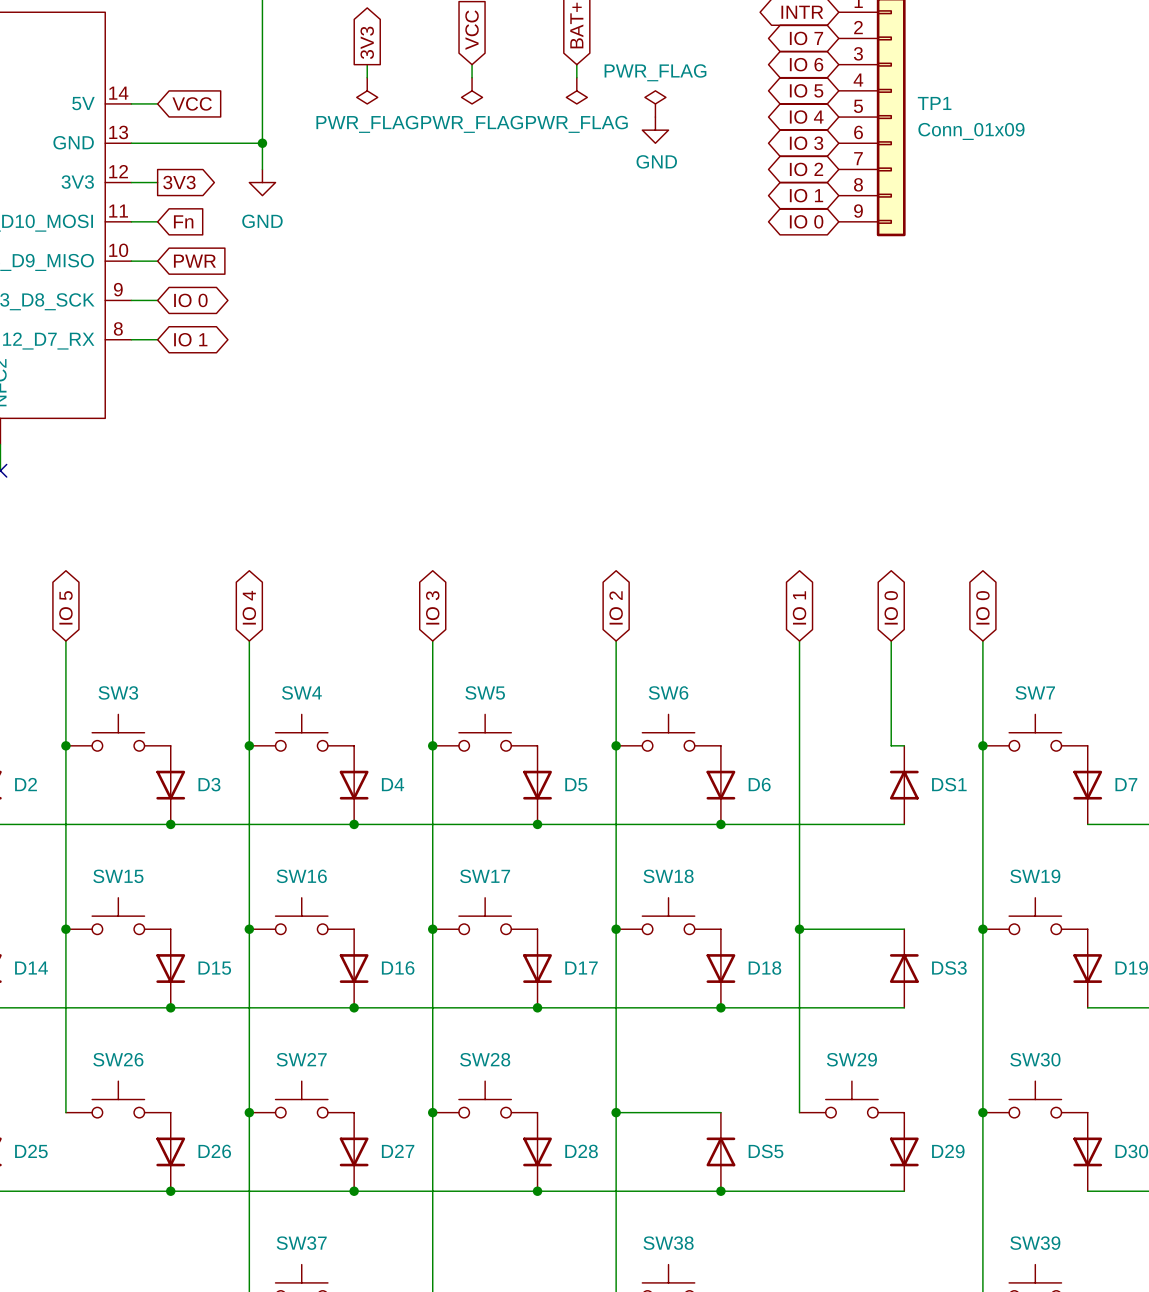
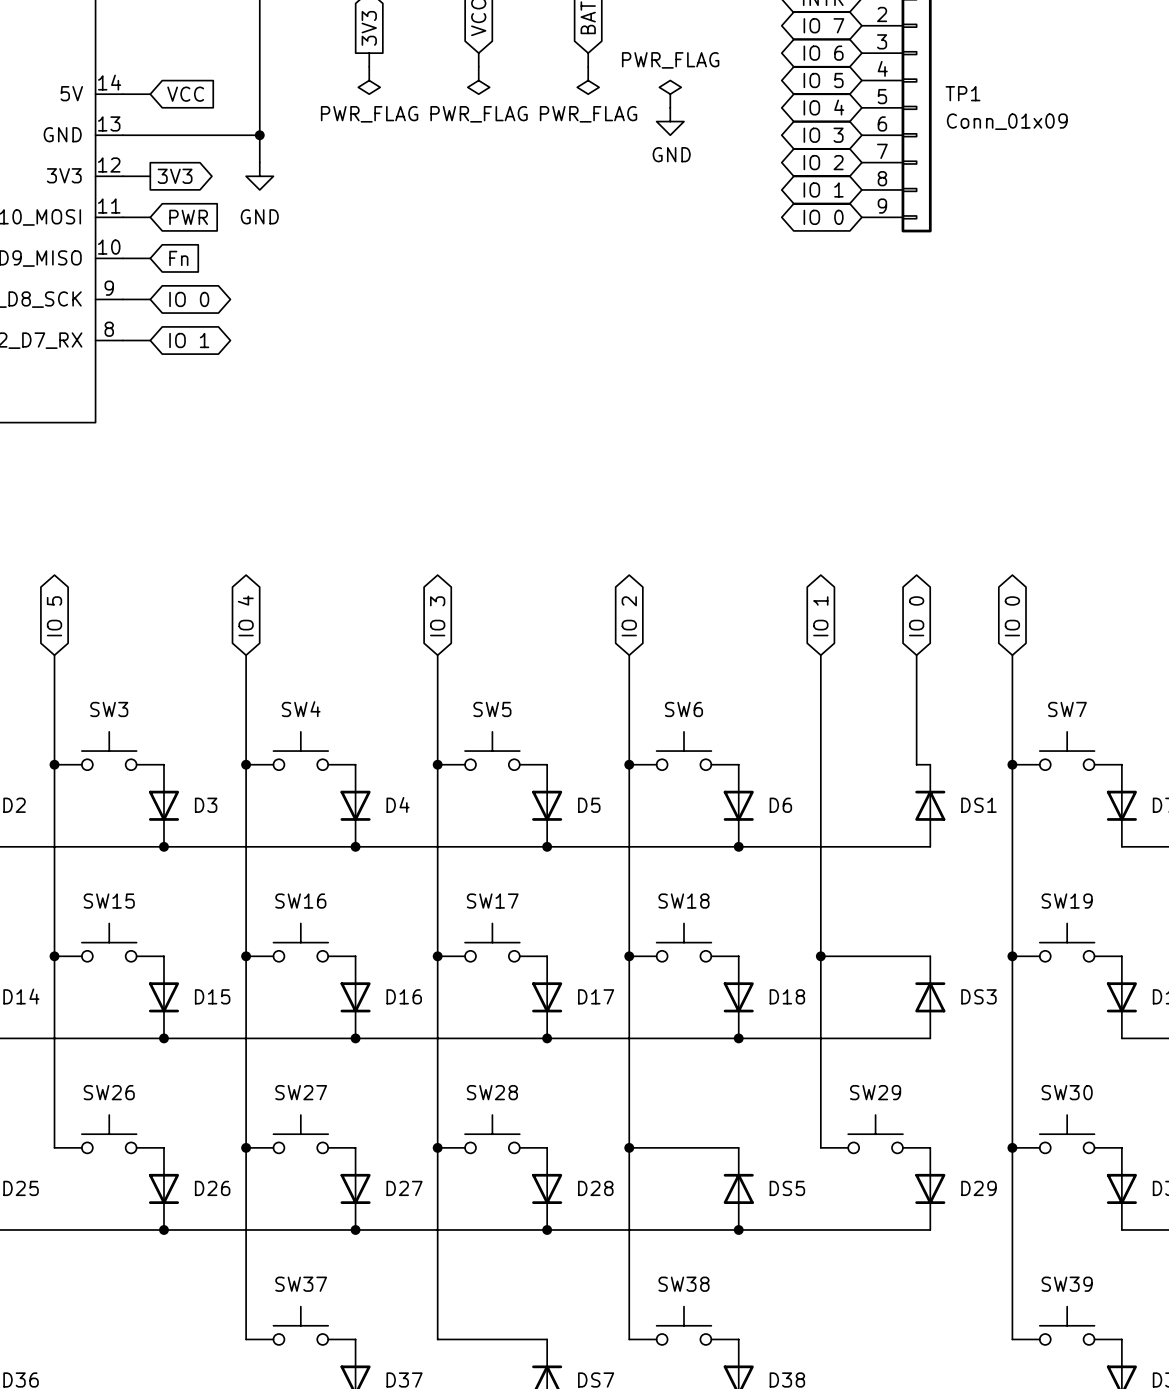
global label: Fn (183, 221) -> PWR (188, 217)
global label: PWR (194, 261) -> Fn (178, 258)

